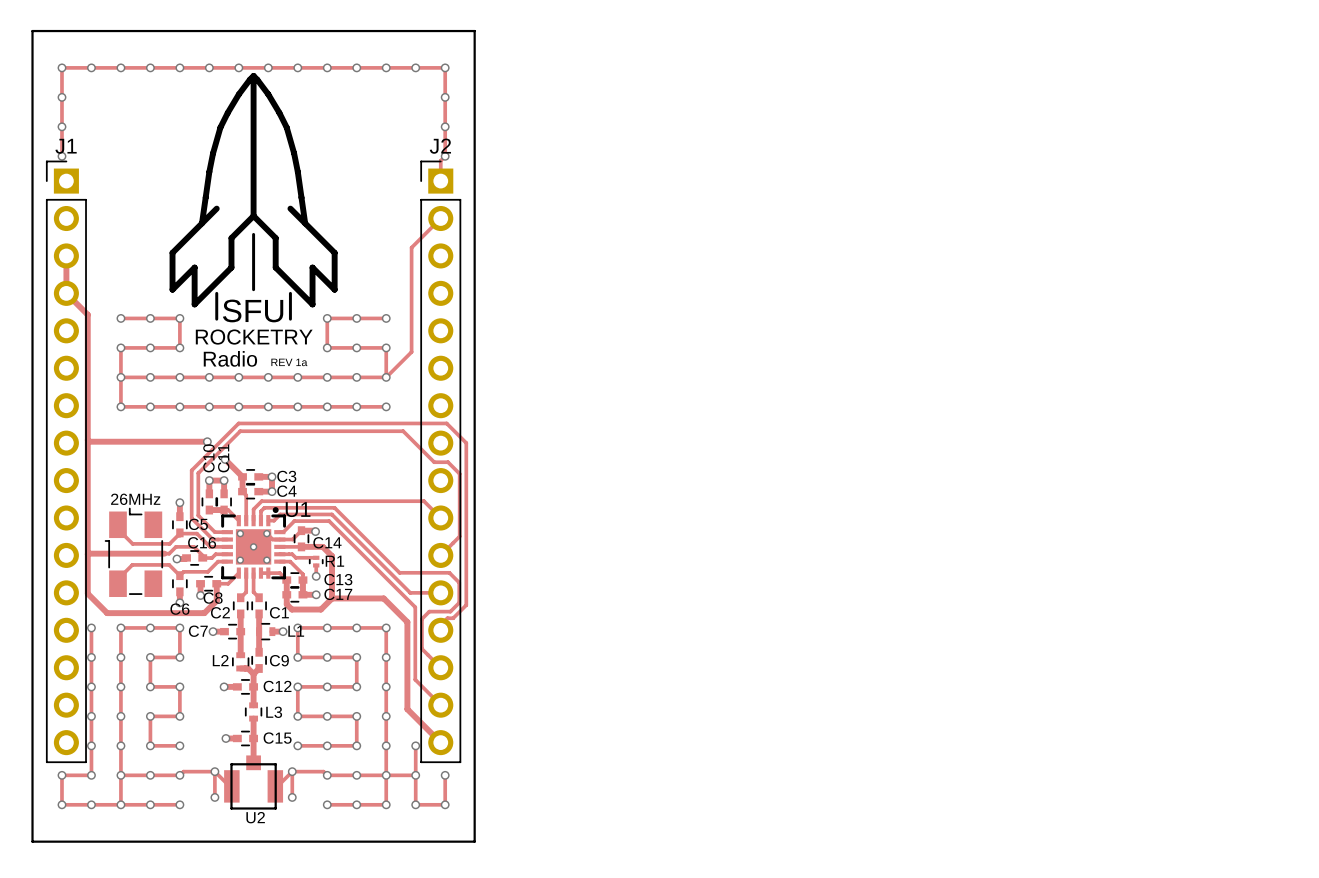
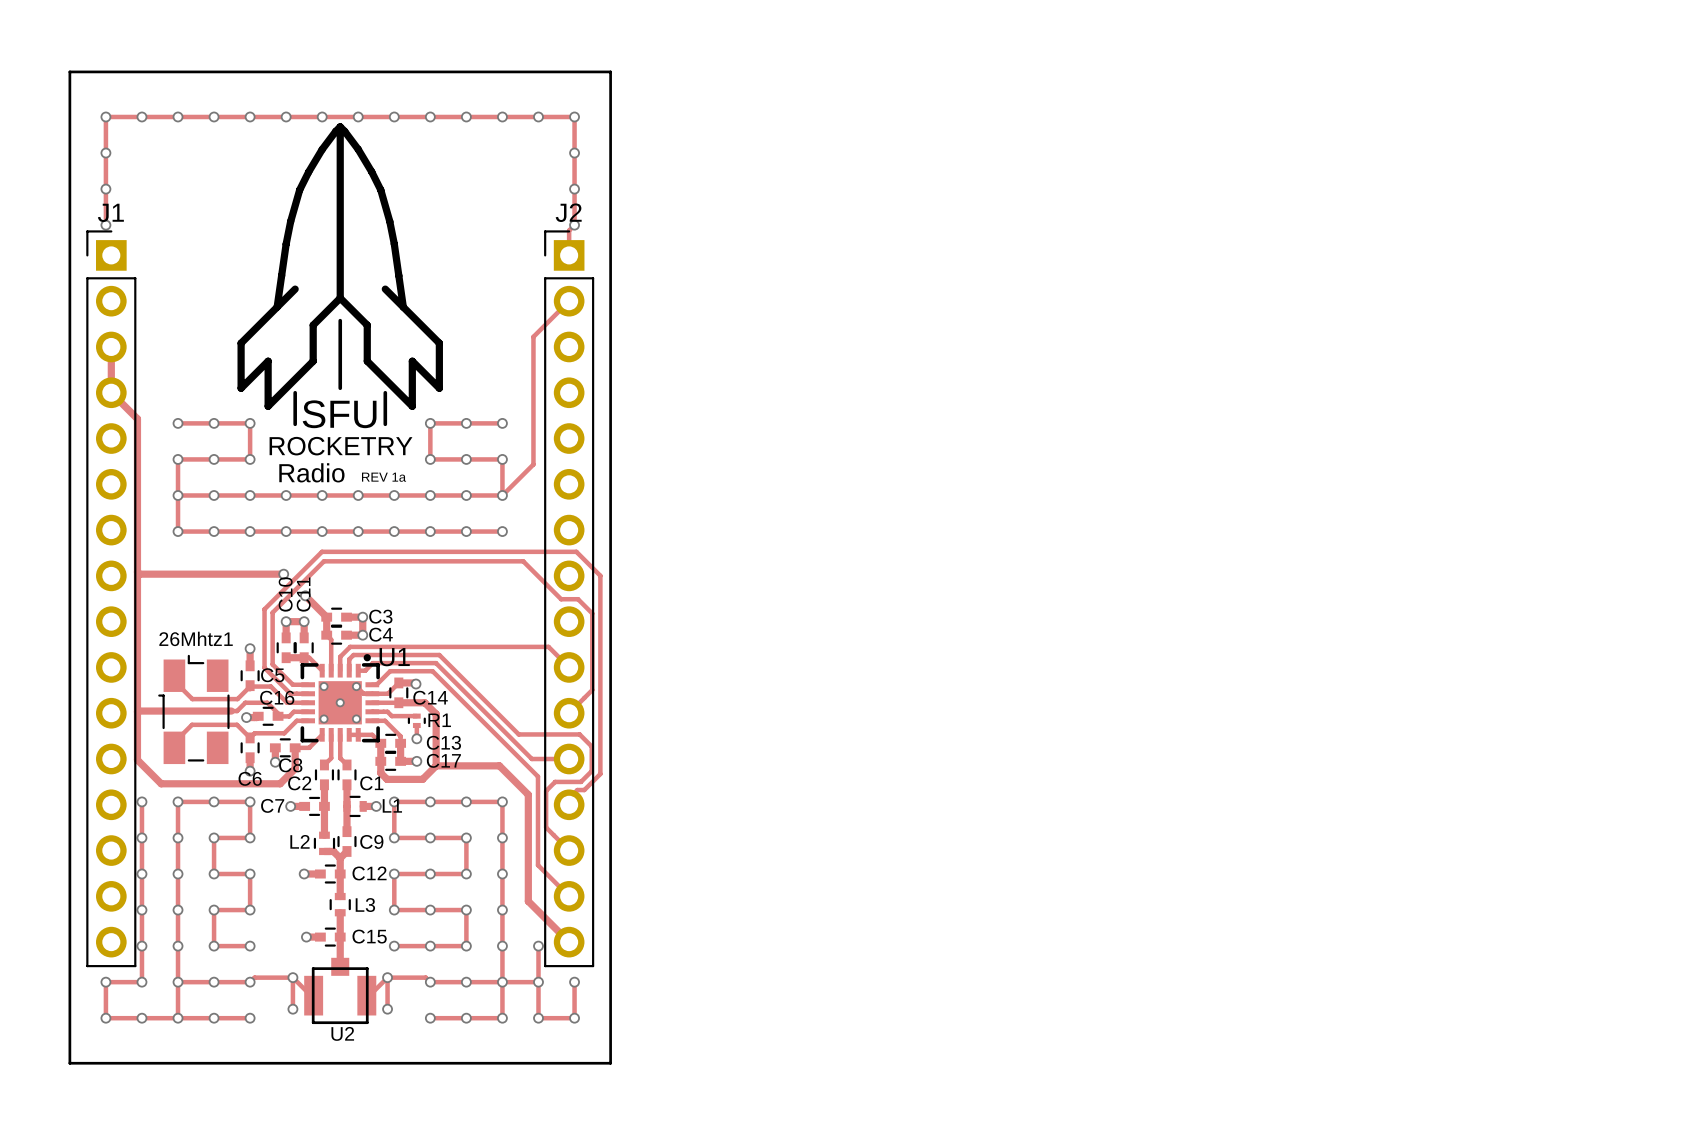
26Mhtz1 name: none -> 26Mhtz1 (196, 638)
text: 26MHz (135, 499) -> none

